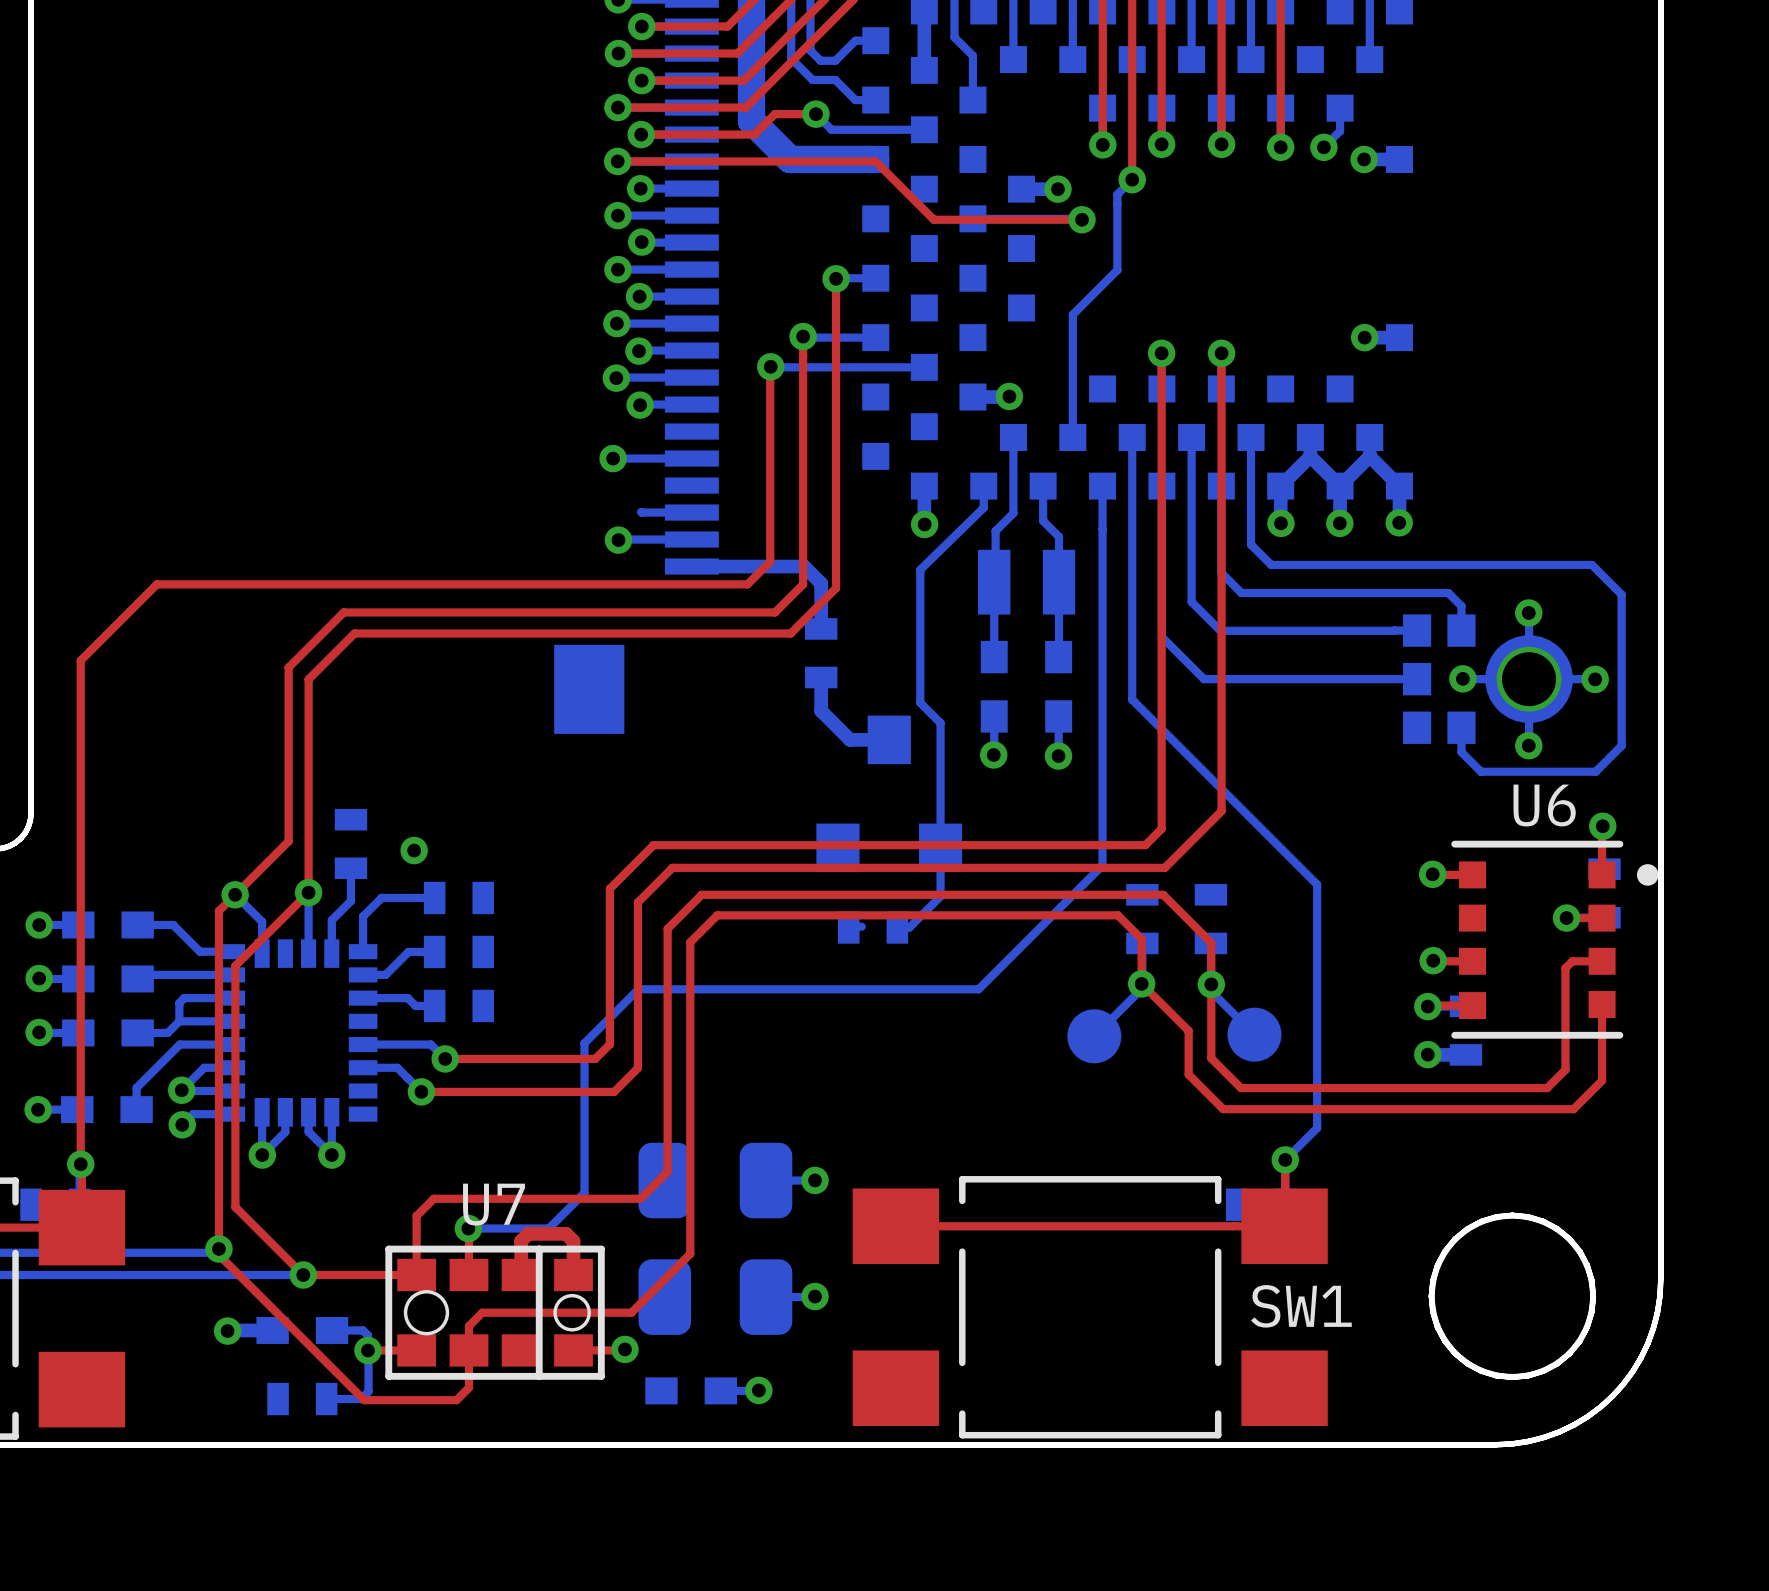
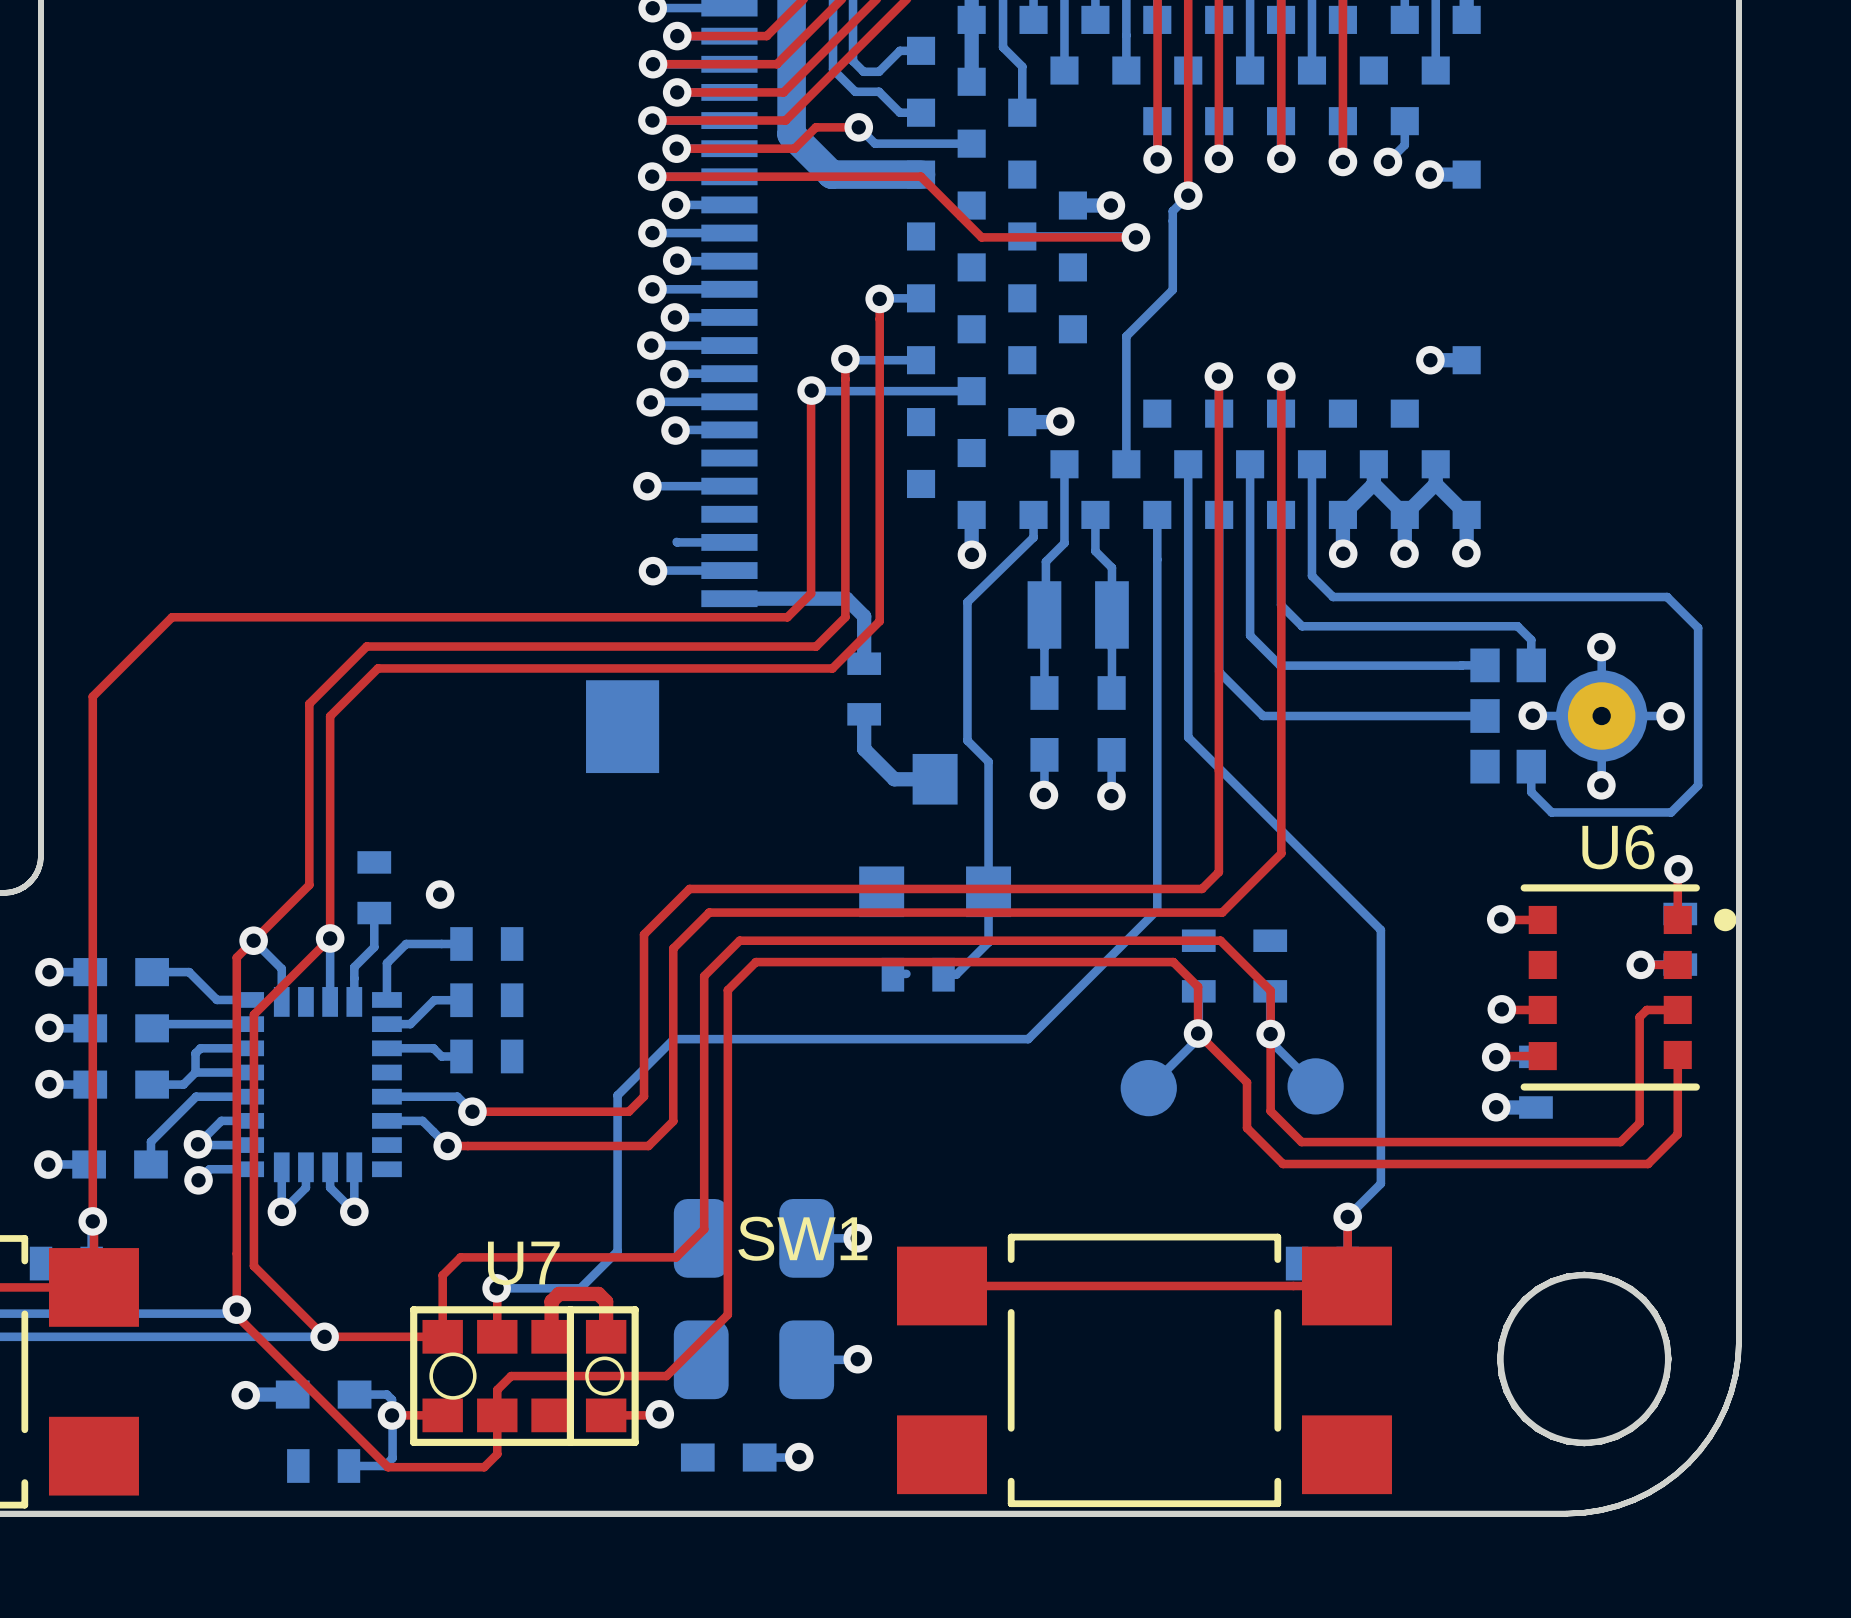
part footprint: [1403, 614, 1573, 744] -> [1470, 648, 1648, 784]
SW1 name position: SW1 (1301, 1306) -> SW1 (802, 1238)

